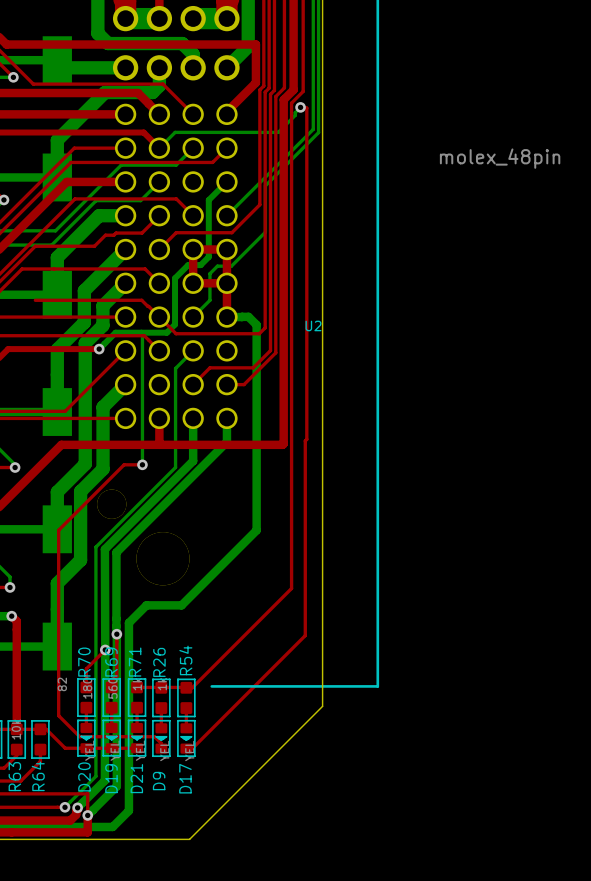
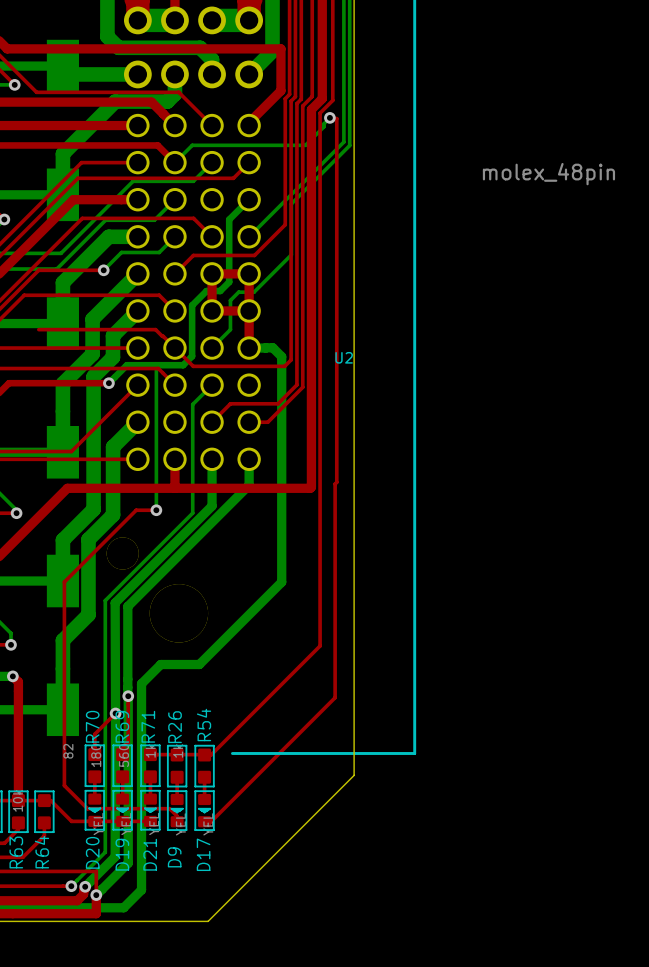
top track: (159, 215) (142, 233) (116, 233) (113, 235) (105, 235) (94, 246) -> none
bottom track: none -> (174, 236) (159, 252) (121, 252) (103, 270)
via: none -> (103, 270)

